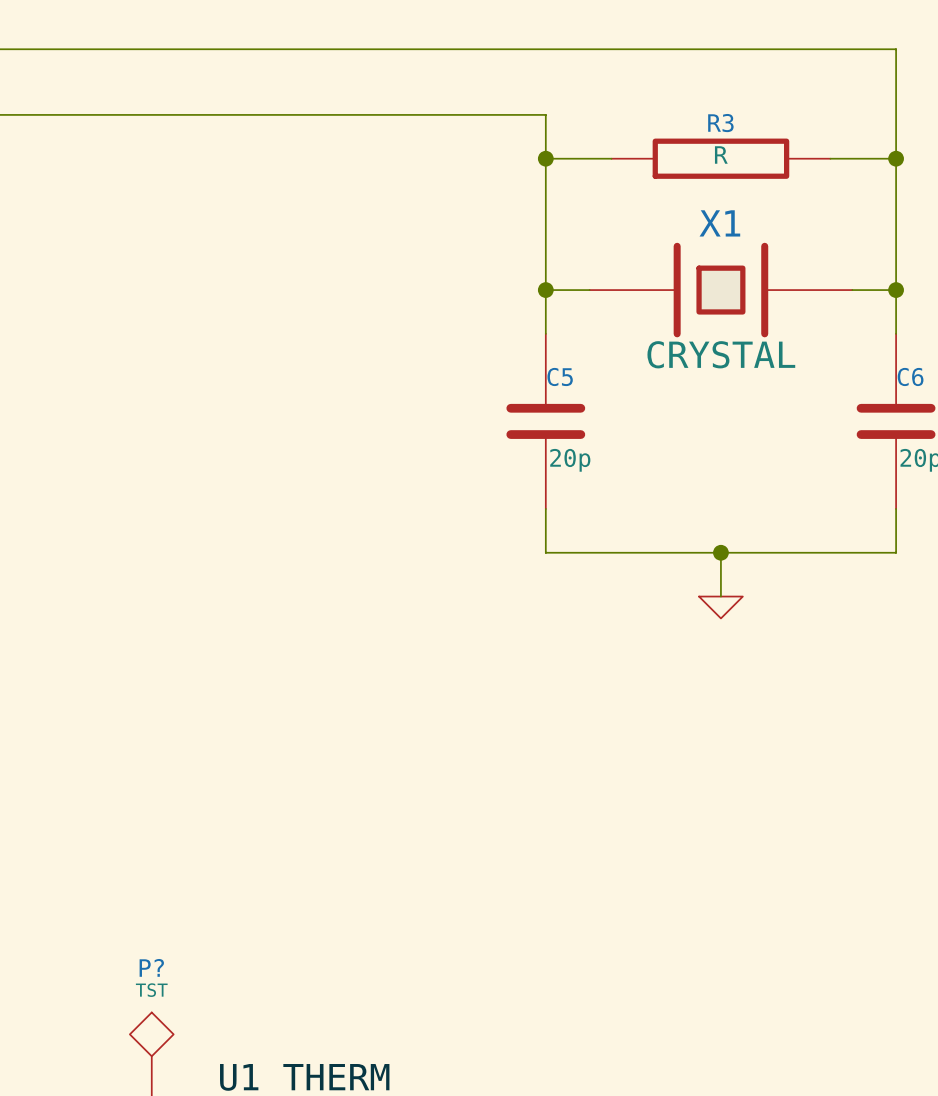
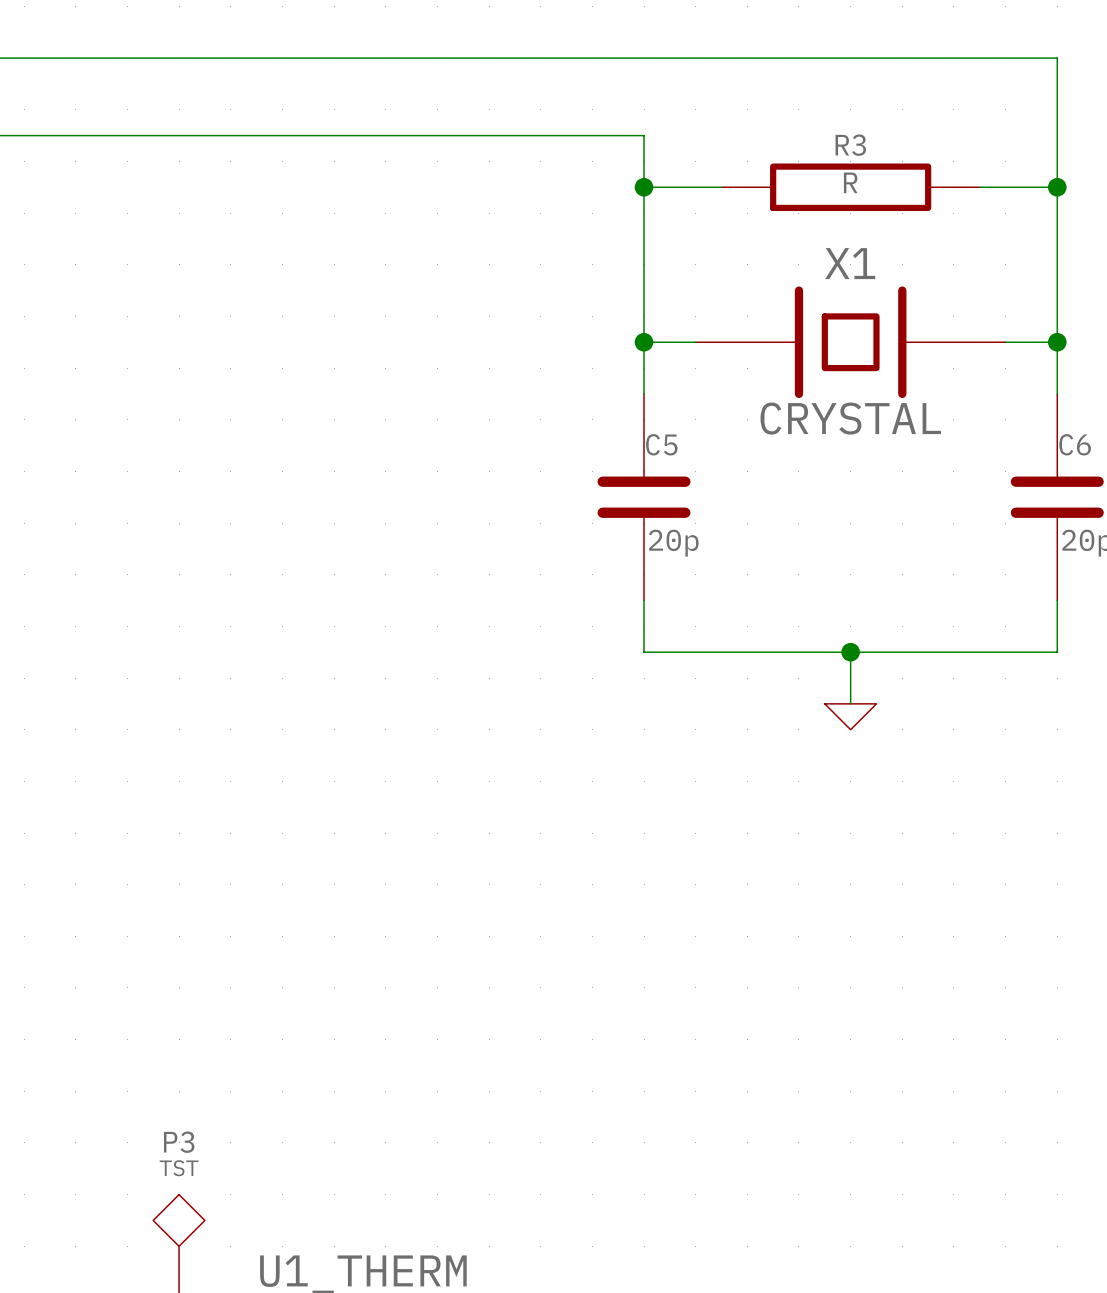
P? name: P? (151, 967) -> P3 (179, 1142)

